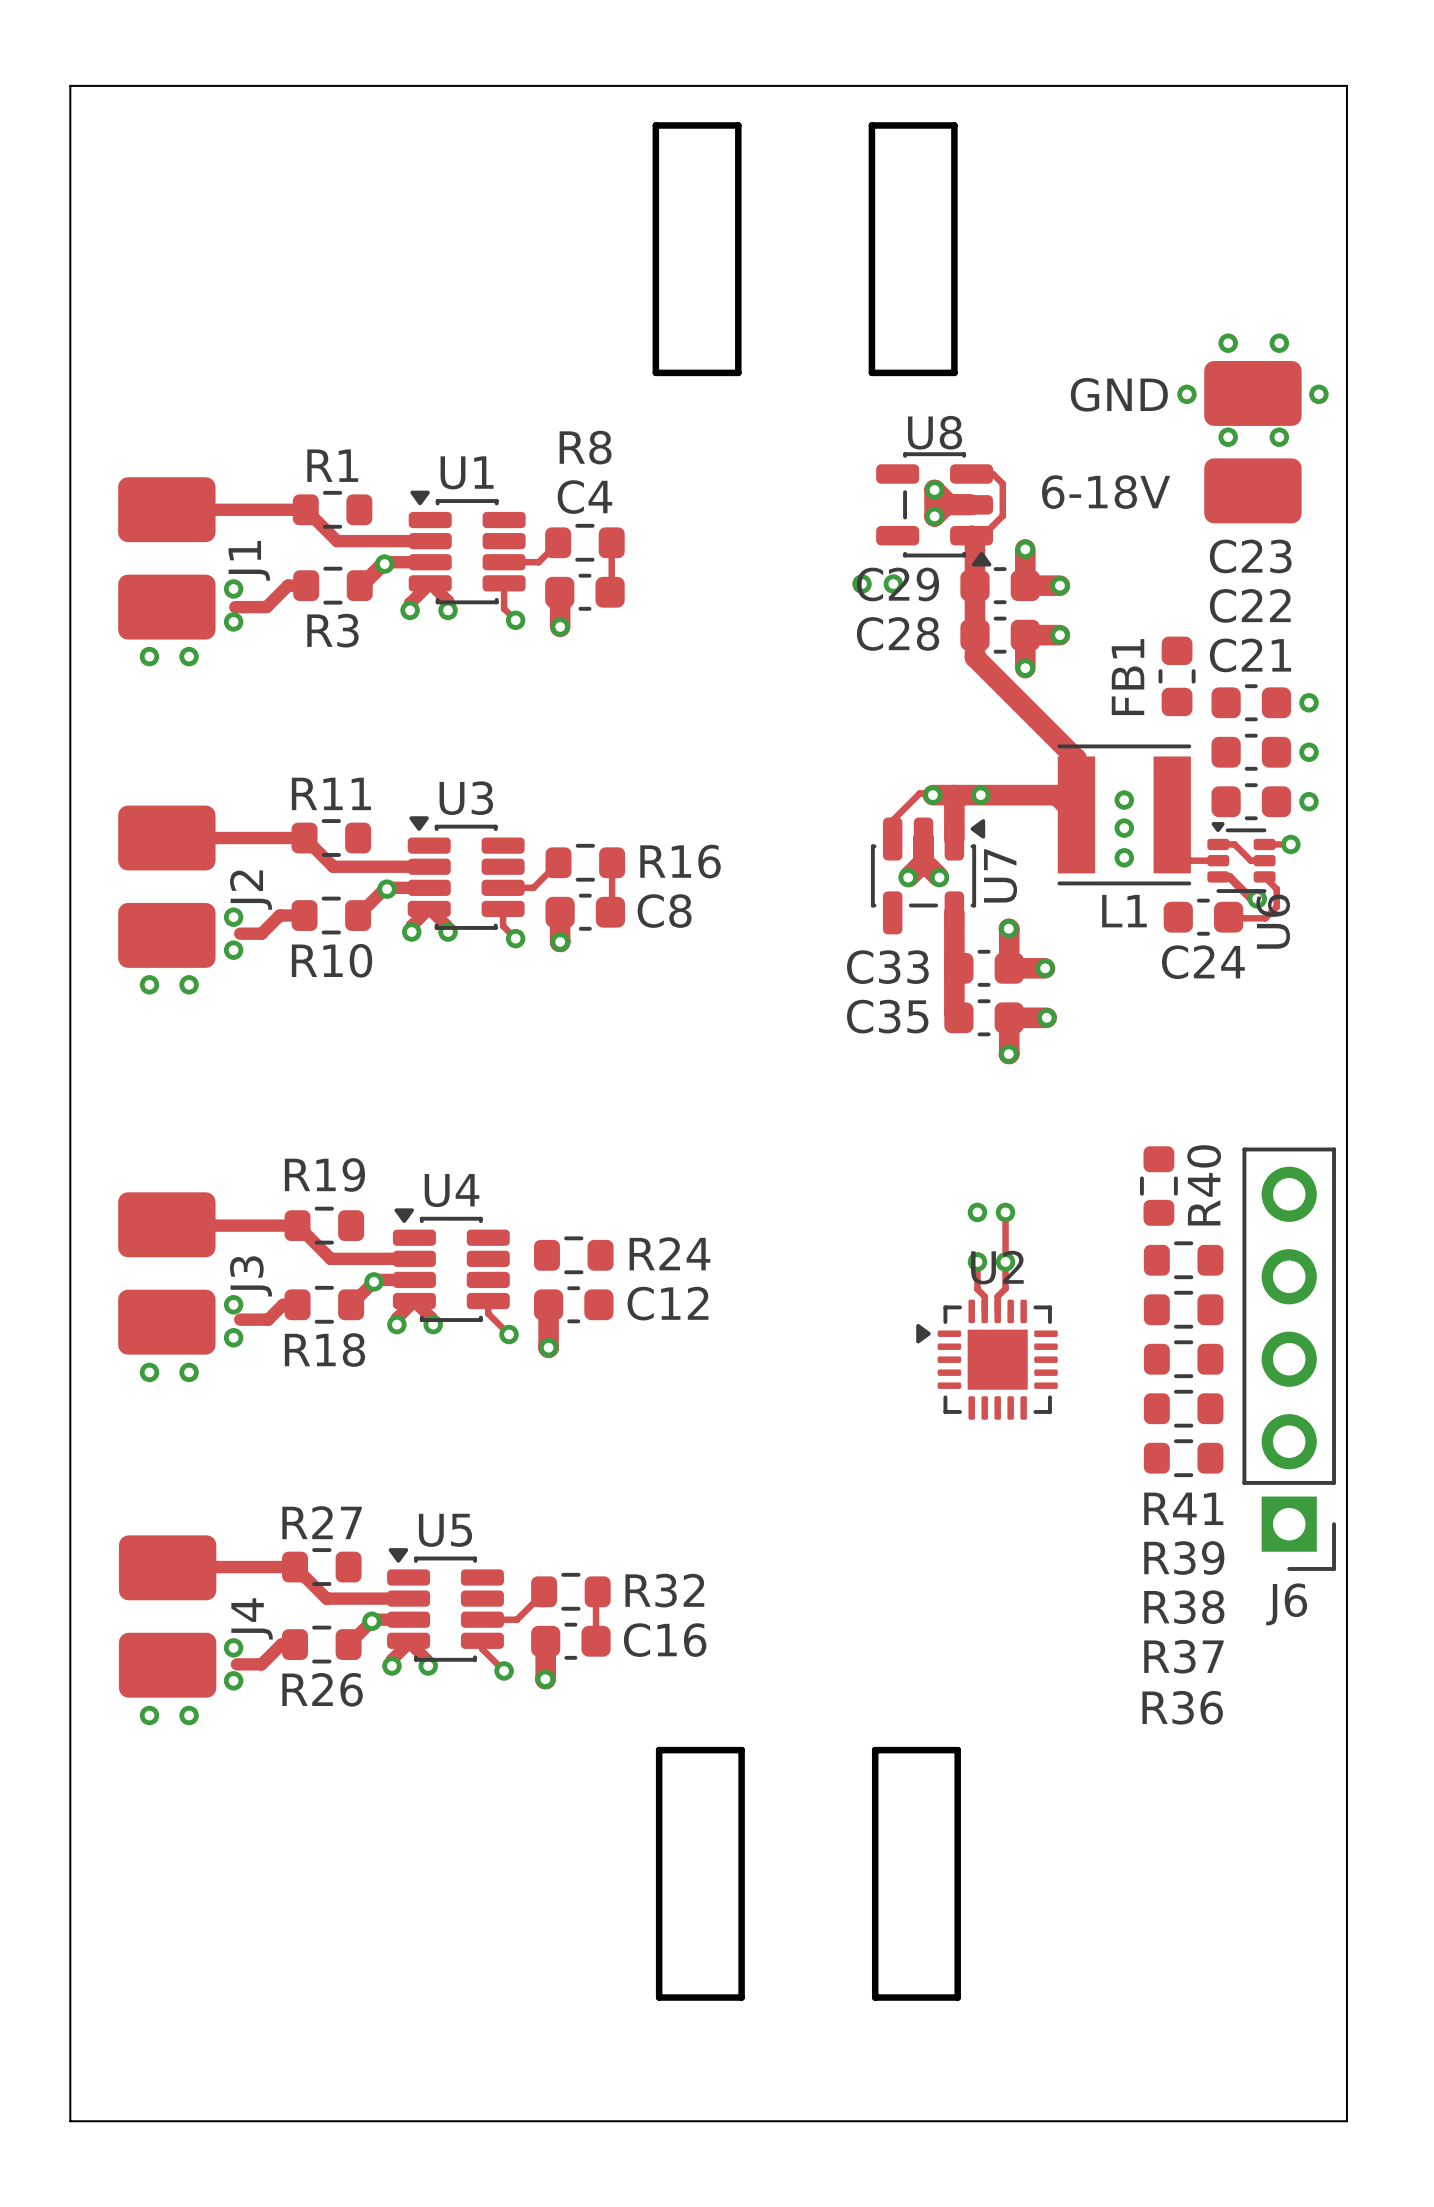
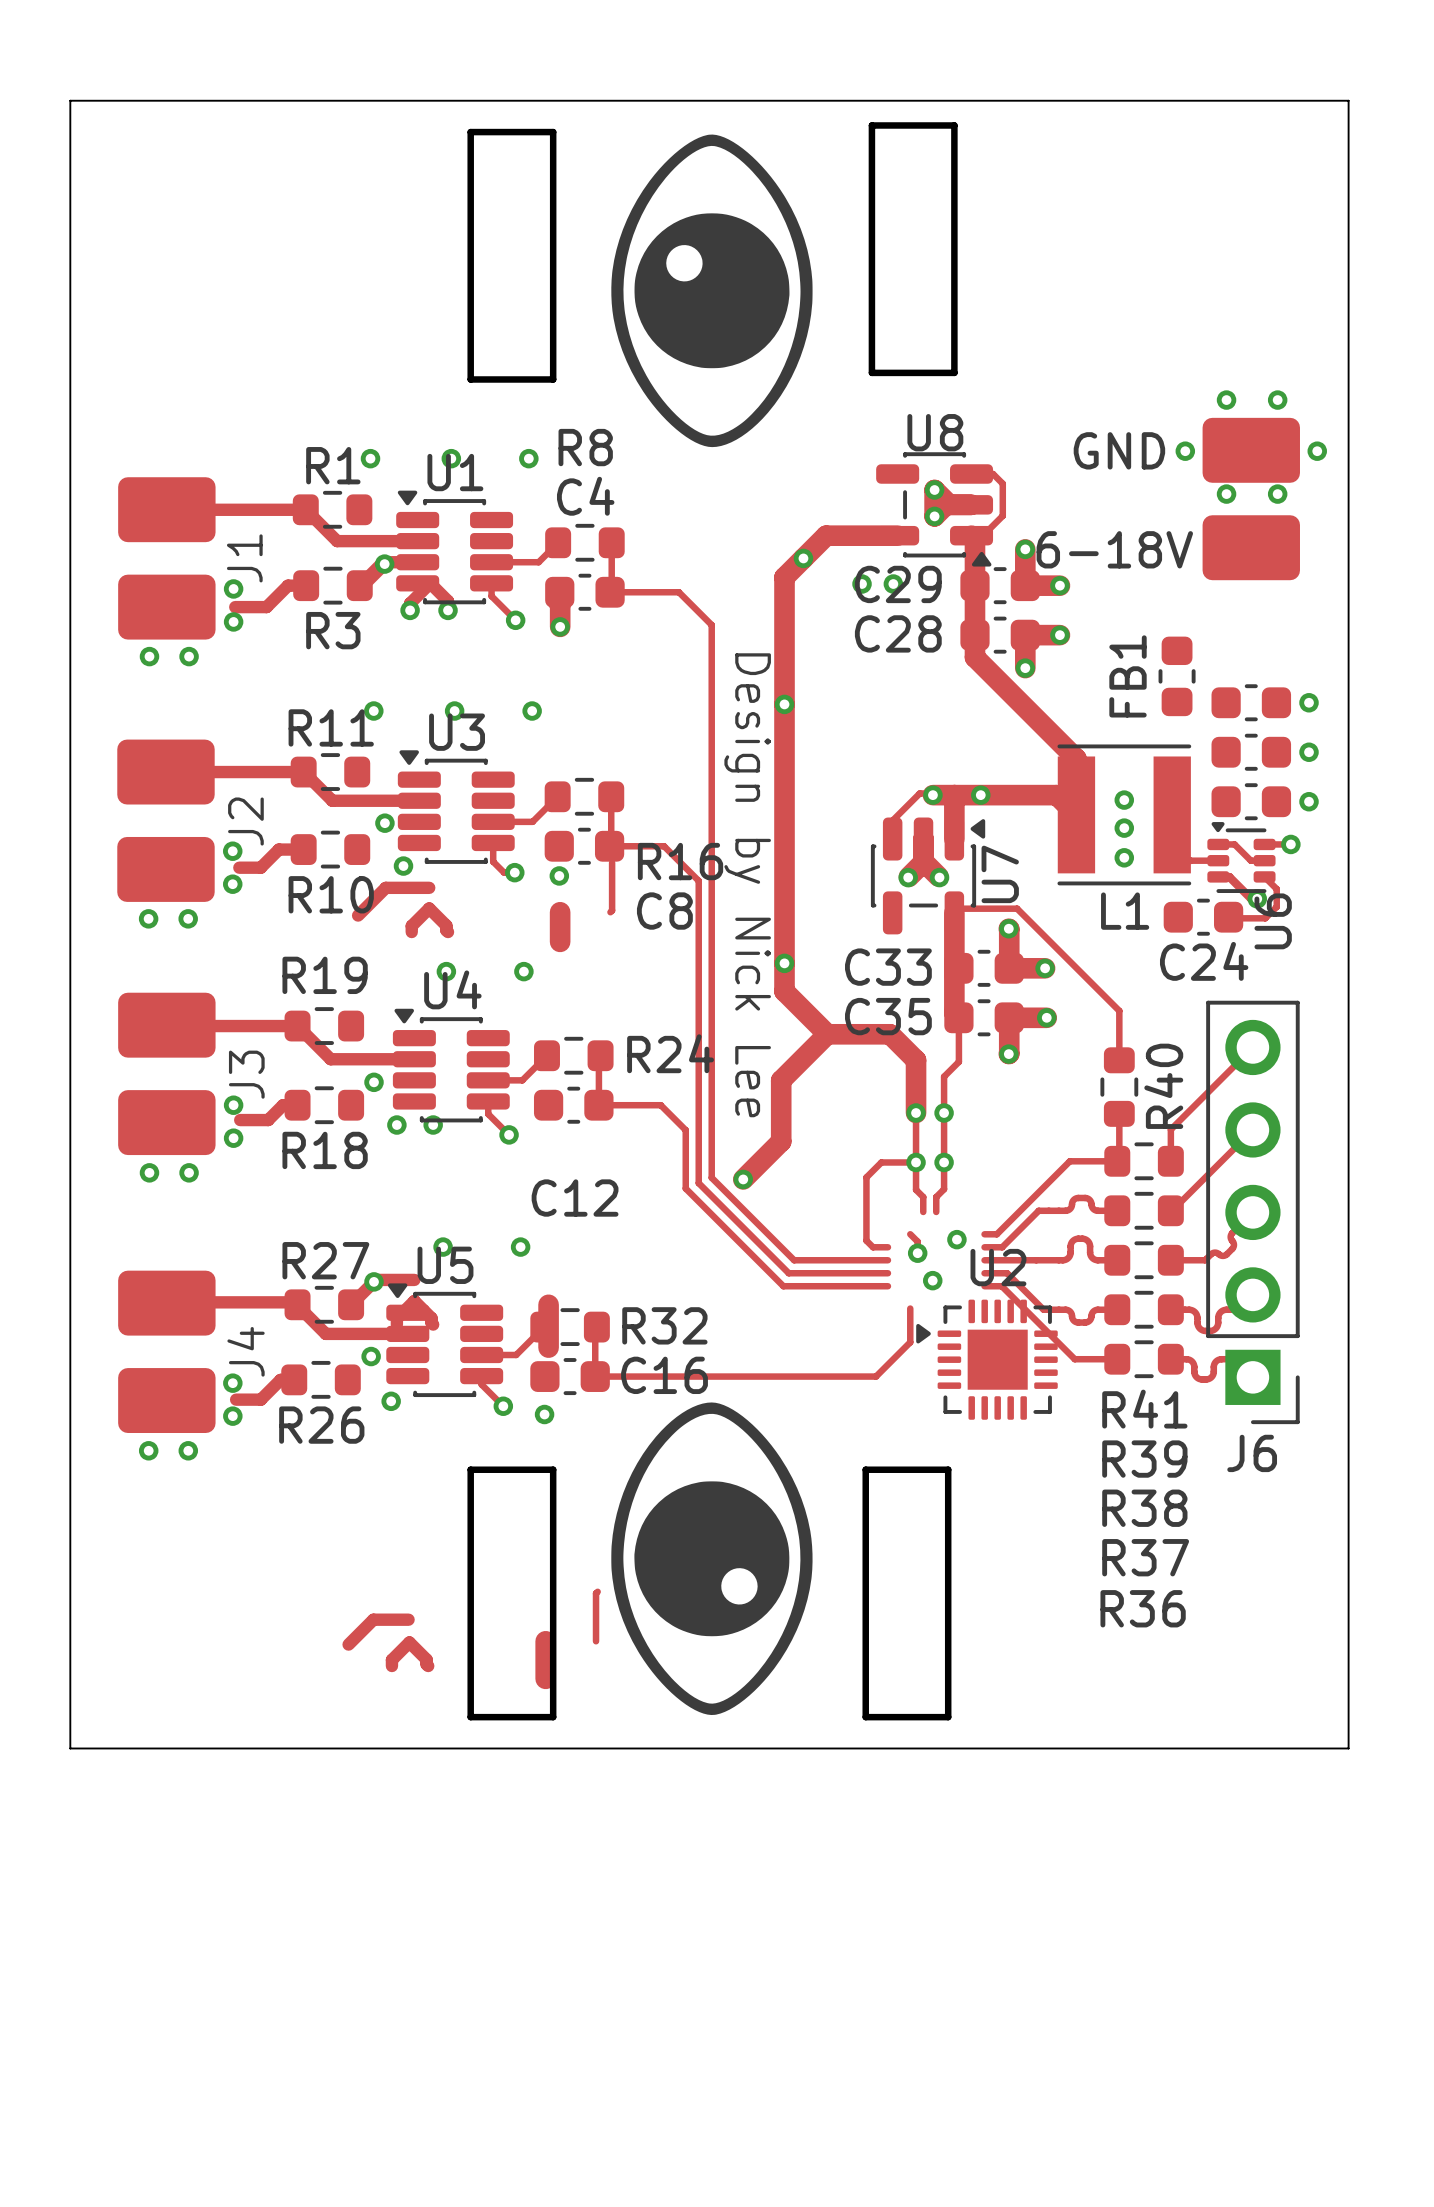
board edge: (70, 100) (70, 85) (1346, 85) (1346, 2121) (70, 2121) (70, 1748) -> (70, 100) (1348, 100) (1348, 1748) (70, 1748)
board edge: (655, 125) (738, 125) (738, 372) (655, 372) (655, 125) -> (470, 132) (553, 132) (553, 379) (470, 379) (470, 132)
drawing: none -> [611, 134, 813, 448]
via: (1228, 343) -> none
via: (1279, 343) -> none
text position: GND (1119, 394) -> GND (1119, 450)
via: (1186, 394) -> none
via: (1318, 394) -> none
via: none -> (1226, 400)
via: none -> (1277, 400)
via: (1228, 437) -> none
via: (1279, 437) -> none
part position: (1252, 442) -> (1251, 499)
via: none -> (1185, 451)
via: none -> (1317, 451)
via: none -> (370, 458)
via: none -> (451, 458)
via: none -> (528, 458)
part value position: 6-18V (1106, 492) -> 6-18V (1114, 549)
via: none -> (1226, 494)
via: none -> (1277, 494)
track: none -> (897, 535) (826, 535) (784, 577) (784, 991) (827, 1034)
U1 position: (467, 547) -> (454, 547)
C23 name: C23 (1250, 556) -> none
via: none -> (803, 558)
track: (504, 583) (504, 608) -> (491, 583) (491, 596) (504, 608)
track: none -> (610, 592) (678, 592) (711, 625) (711, 1177) (794, 1260) (887, 1260)
C22 name: C22 (1250, 605) -> none
C21 name: C21 (1250, 655) -> none
via: none -> (784, 704)
via: none -> (373, 711)
via: none -> (454, 711)
via: none -> (532, 711)
track: none -> (611, 796) (611, 844) (609, 846) (664, 846) (698, 880) (698, 1183) (788, 1273) (887, 1273)
via: none -> (384, 823)
track: (166, 838) (304, 838) (333, 866) (429, 866) -> (165, 772) (303, 772) (332, 800) (428, 800)
R11 position: (331, 838) -> (330, 772)
track: none -> (493, 842) (493, 861) (504, 872) (514, 872)
via: none -> (232, 851)
text: none -> Design by Nick Lee (747, 885)
track: (558, 862) (533, 887) (503, 887) -> (557, 796) (532, 821) (502, 821)
R16 position: (585, 862) -> (584, 796)
via: none -> (514, 872)
U3 position: (466, 873) -> (456, 807)
via: none -> (559, 875)
via: none -> (232, 884)
J2 position: (166, 886) -> (165, 820)
via position: (387, 889) -> (403, 866)
track: (503, 908) (503, 926) (515, 938) -> none
C8 position: (585, 912) -> (584, 846)
track: none -> (954, 912) (958, 908) (1017, 908) (1119, 1010) (1119, 1060)
track: (304, 915) (279, 915) (261, 933) (240, 933) -> (303, 849) (278, 849) (260, 867) (239, 867)
R10 position: (331, 915) -> (330, 849)
via: (233, 917) -> none
via: none -> (148, 918)
via: none -> (188, 918)
via: (411, 932) -> none
via: (448, 932) -> none
via: (515, 938) -> none
via: (560, 941) -> none
via: (233, 950) -> none
via: none -> (784, 963)
via: none -> (446, 971)
via: none -> (523, 971)
via: (149, 984) -> none
via: (189, 984) -> none
track: none -> (958, 1017) (958, 1061) (944, 1076) (944, 1189) (936, 1197) (936, 1211)
track: none -> (827, 1034) (890, 1034) (916, 1060) (916, 1189) (923, 1197) (923, 1211)
track: none -> (827, 1034) (781, 1080) (781, 1141) (743, 1179)
track: none -> (1252, 1047) (1170, 1129) (1170, 1161)
track: none -> (546, 1055) (522, 1080) (488, 1080)
track: none -> (600, 1055) (598, 1057) (598, 1105) (660, 1105) (685, 1130) (685, 1188) (783, 1286) (887, 1286)
via: none -> (374, 1082)
via: none -> (233, 1105)
R18: none -> (324, 1105)
via: none -> (916, 1113)
via: none -> (944, 1113)
track: none -> (1119, 1113) (1119, 1159) (1117, 1161) (1069, 1161) (996, 1234) (984, 1234)
via: none -> (396, 1125)
via: none -> (433, 1125)
track: none -> (1252, 1129) (1170, 1210)
via: none -> (509, 1134)
via: none -> (233, 1138)
track: none -> (916, 1162) (881, 1162) (866, 1177) (866, 1240) (873, 1247) (887, 1247)
via: none -> (916, 1162)
via: none -> (944, 1162)
via: none -> (149, 1172)
via: none -> (189, 1172)
via: none -> (743, 1179)
R40 position: (1158, 1186) -> (1119, 1087)
track: none -> (1117, 1210) (1096, 1210) (1092, 1208) (1088, 1198) (1076, 1198) (1067, 1210) (1038, 1210) (1002, 1247) (984, 1247)
via: (977, 1212) -> none
track: (1005, 1212) (1005, 1288) (997, 1296) (997, 1311) -> none
via: (1005, 1212) -> none
track: none -> (1252, 1212) (1231, 1234) (1233, 1246) (1225, 1255) (1221, 1255) (1214, 1252) (1205, 1260) (1170, 1260)
track: (166, 1224) (297, 1225) (330, 1258) (414, 1258) -> (166, 1025) (297, 1026) (330, 1059) (414, 1059)
R19 position: (324, 1225) -> (324, 1026)
track: none -> (910, 1234) (917, 1241) (917, 1253)
via: none -> (956, 1239)
via: none -> (443, 1247)
via: none -> (520, 1247)
via: none -> (917, 1253)
R24 position: (573, 1255) -> (573, 1055)
track: none -> (984, 1260) (1064, 1260) (1070, 1255) (1071, 1242) (1078, 1238) (1088, 1241) (1090, 1255) (1093, 1259) (1117, 1260)
R41 position: (1183, 1260) -> (1144, 1161)
track: (977, 1261) (977, 1289) (984, 1296) (984, 1311) -> none
via: (977, 1261) -> none
via: (1005, 1261) -> none
U4 position: (451, 1265) -> (451, 1065)
J3 position: (166, 1273) -> (166, 1073)
track: none -> (984, 1273) (1007, 1273) (1043, 1309) (1068, 1310) (1076, 1322) (1088, 1321) (1092, 1312) (1096, 1309) (1117, 1309)
via: none -> (932, 1280)
track: none -> (984, 1286) (1001, 1286) (1074, 1359) (1117, 1359)
track: none -> (1252, 1294) (1238, 1309) (1221, 1311) (1218, 1315) (1217, 1326) (1211, 1330) (1199, 1328) (1196, 1314) (1193, 1310) (1170, 1309)
track: (488, 1301) (488, 1313) (509, 1334) -> (488, 1101) (488, 1114) (509, 1134)
C12 name position: C12 (668, 1303) -> C12 (575, 1198)
via: (233, 1304) -> none
track: (297, 1304) (283, 1304) (268, 1319) (240, 1319) -> (297, 1105) (283, 1105) (268, 1120) (240, 1120)
C12 position: (573, 1304) -> (573, 1105)
track: none -> (910, 1308) (910, 1342) (876, 1376) (595, 1376) (595, 1328) (596, 1327)
R39 position: (1183, 1309) -> (1144, 1210)
via: (396, 1324) -> none
via: (433, 1324) -> none
via: (509, 1334) -> none
via: (233, 1337) -> none
via: (548, 1347) -> none
R18 name: R18 (324, 1350) -> R27 (325, 1260)
via: none -> (371, 1356)
track: none -> (1170, 1359) (1190, 1360) (1193, 1364) (1195, 1375) (1202, 1379) (1212, 1376) (1214, 1364) (1217, 1360) (1234, 1359) (1252, 1377)
R38 position: (1183, 1359) -> (1144, 1260)
J6 position: (1289, 1359) -> (1252, 1212)
via: (149, 1372) -> none
via: (189, 1372) -> none
via: none -> (232, 1383)
via: none -> (391, 1401)
drawing: none -> [611, 1402, 813, 1716]
via: none -> (503, 1406)
R37 position: (1183, 1408) -> (1144, 1309)
via: none -> (544, 1414)
via: none -> (232, 1416)
via: none -> (148, 1450)
via: none -> (188, 1450)
R36 position: (1183, 1458) -> (1144, 1359)
track: (167, 1567) (295, 1567) (326, 1598) (408, 1598) -> (166, 1303) (294, 1302) (325, 1333) (407, 1333)
R27: (321, 1567) -> none
track: (544, 1591) (516, 1619) (482, 1619) -> (543, 1327) (516, 1354) (481, 1354)
R32 position: (570, 1591) -> (570, 1327)
U5 position: (445, 1604) -> (444, 1340)
J4 position: (167, 1616) -> (166, 1351)
via: (371, 1621) -> none
track: (482, 1640) (482, 1649) (504, 1670) -> (481, 1376) (481, 1384) (503, 1406)
C16 position: (570, 1641) -> (570, 1376)
track: (295, 1644) (281, 1644) (261, 1664) (236, 1664) -> (294, 1379) (280, 1379) (260, 1399) (236, 1399)
R26 position: (321, 1644) -> (321, 1379)
via: (233, 1647) -> none
via: (391, 1666) -> none
via: (428, 1666) -> none
via: (504, 1670) -> none
via: (545, 1679) -> none
via: (233, 1680) -> none
via: (149, 1715) -> none
via: (189, 1715) -> none
board edge: (659, 1750) (741, 1750) (741, 1997) (659, 1997) (659, 1750) -> (470, 1469) (553, 1469) (553, 1717) (470, 1717) (470, 1469)
board edge: (875, 1750) (957, 1750) (957, 1997) (875, 1997) (875, 1750) -> (865, 1469) (948, 1469) (948, 1717) (865, 1717) (865, 1469)

